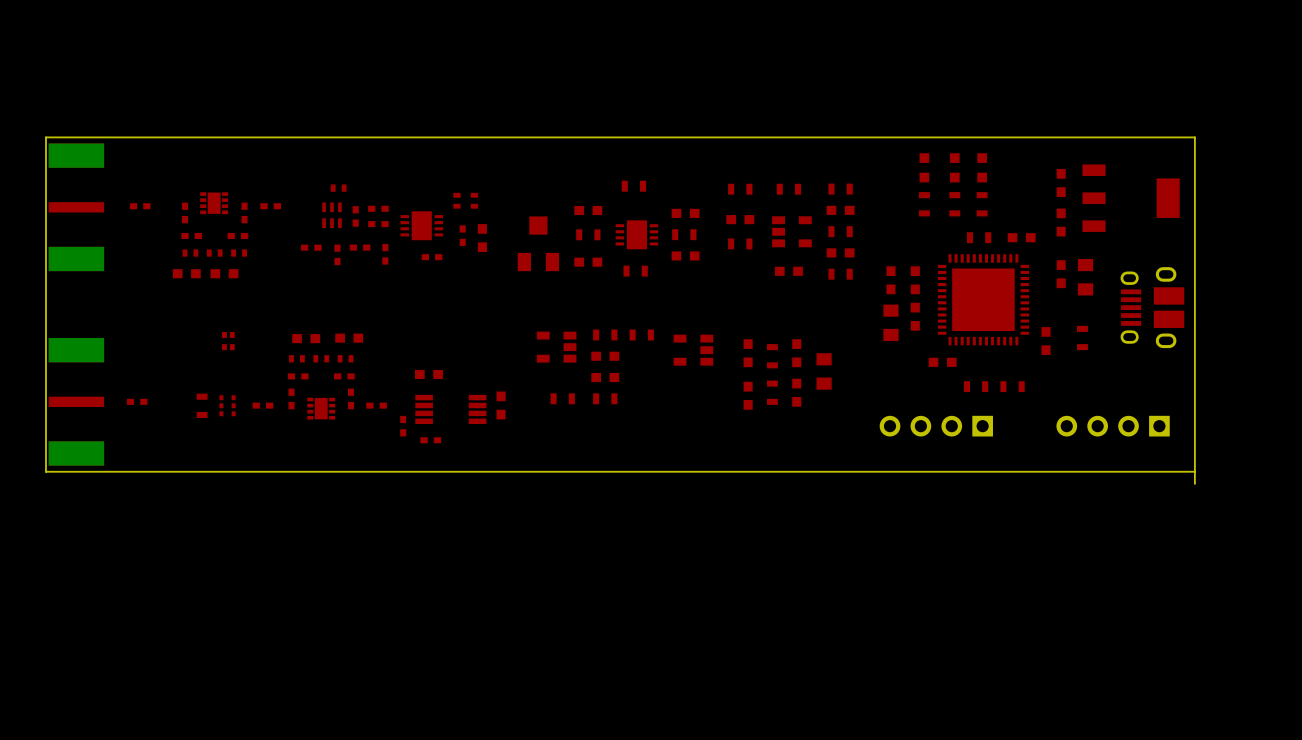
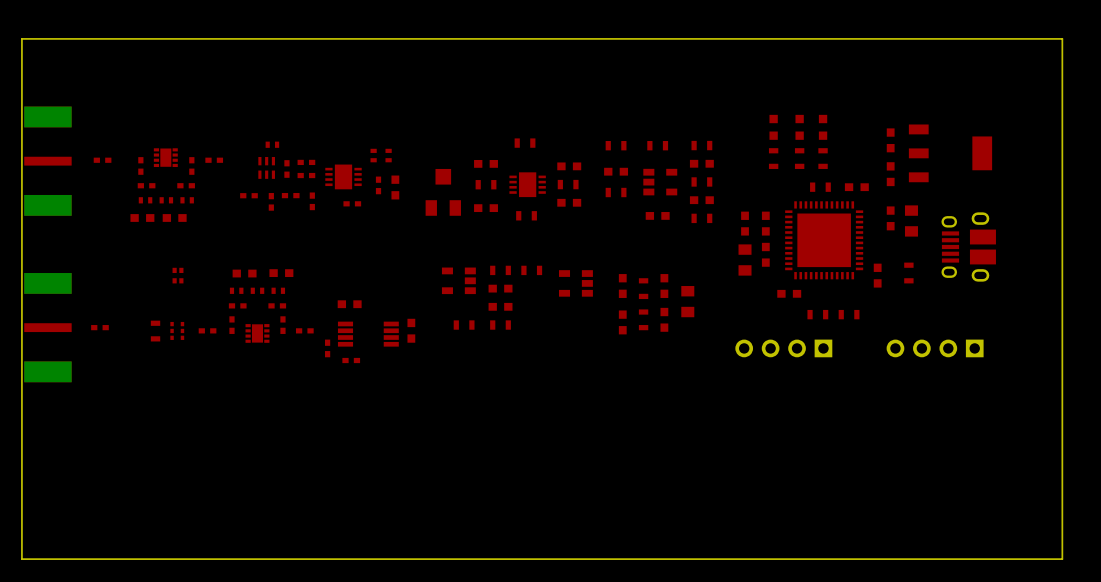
board edge: (46, 137) (1194, 137) (1194, 483) -> (21, 101) (21, 38) (1062, 38) (1062, 559) (21, 559) (21, 387)
board edge: (1194, 471) (46, 471) -> none

